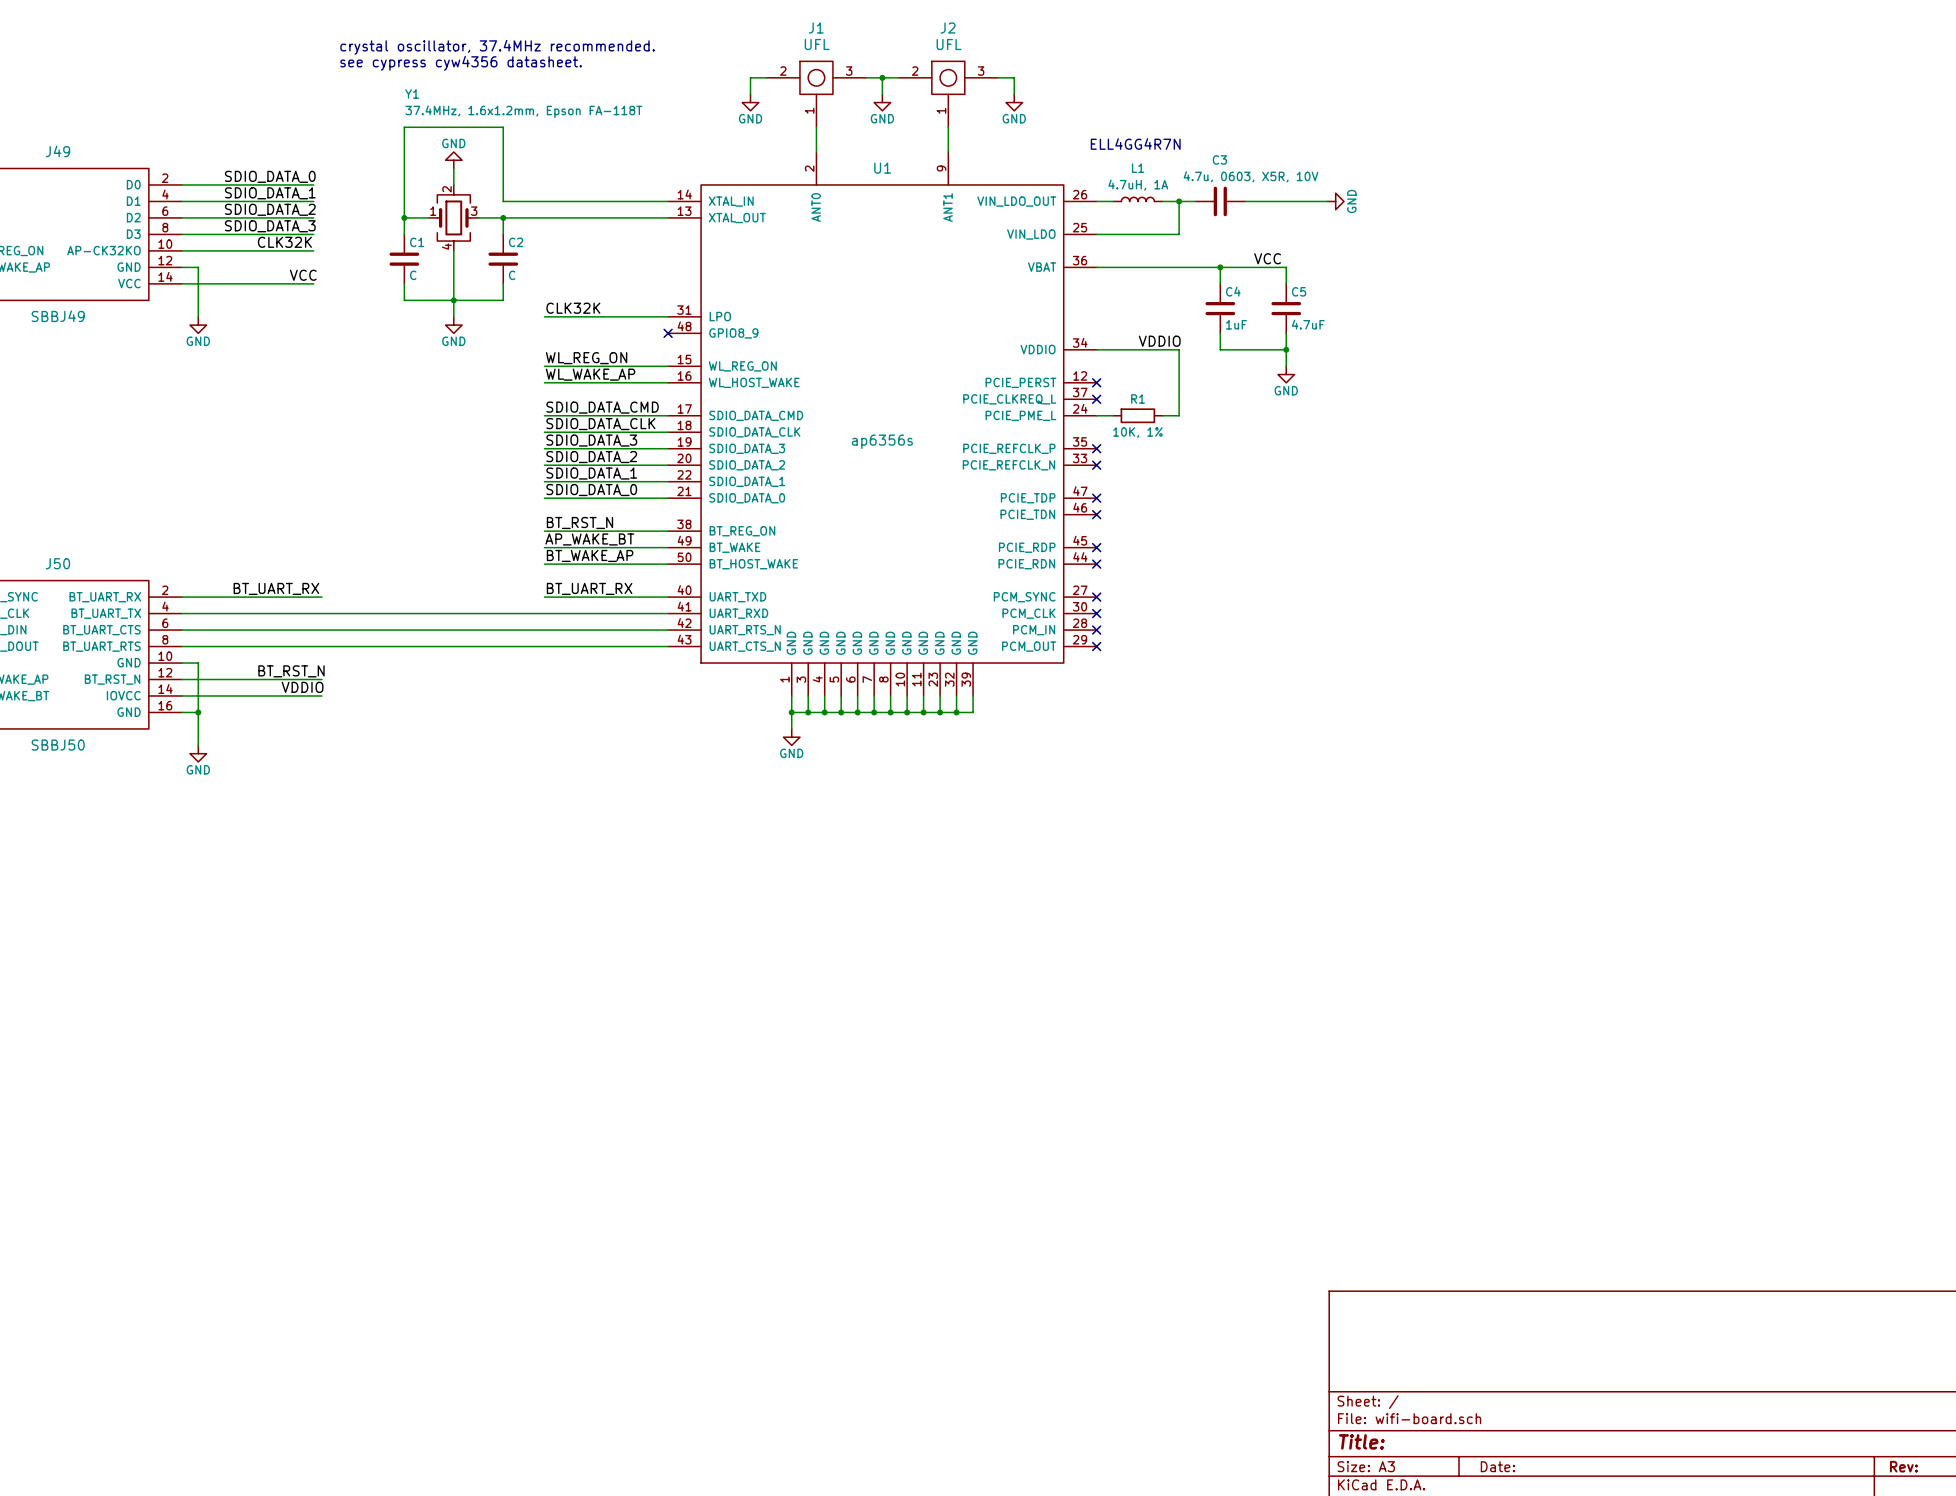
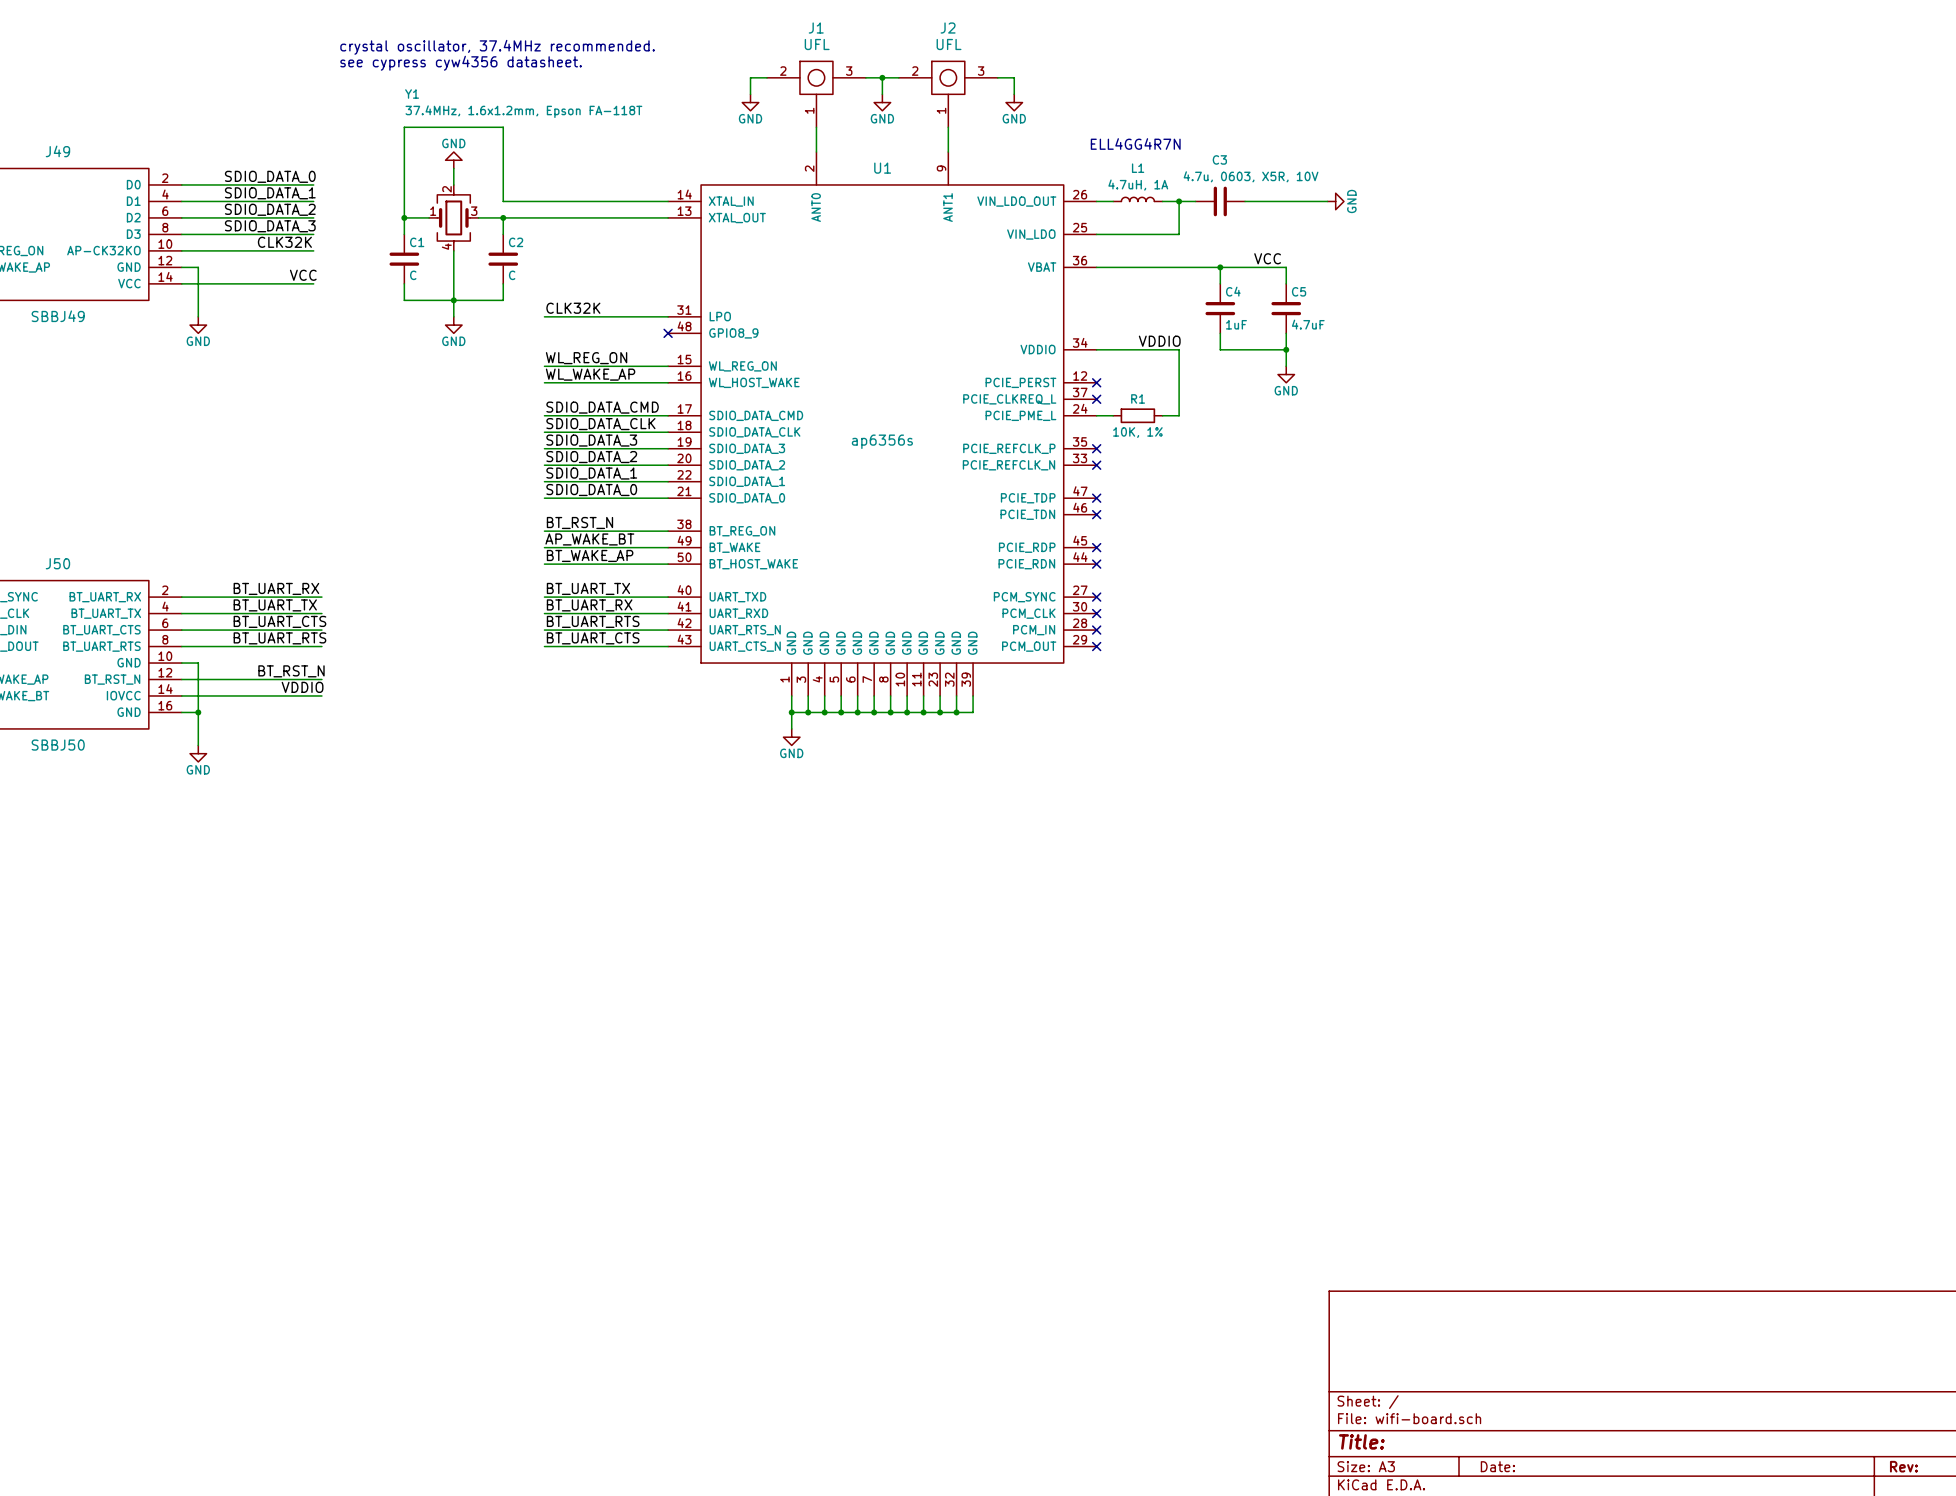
label: BT_UART_RX (589, 588) -> BT_UART_TX (588, 588)
label: none -> BT_UART_TX (275, 605)
label: none -> BT_UART_RX (589, 605)
wire: (321, 613) (544, 613) -> none
label: none -> BT_UART_CTS (279, 621)
label: none -> BT_UART_RTS (593, 621)
wire: (321, 630) (544, 630) -> none
label: none -> BT_UART_RTS (279, 638)
label: none -> BT_UART_CTS (593, 638)
wire: (321, 646) (544, 646) -> none

